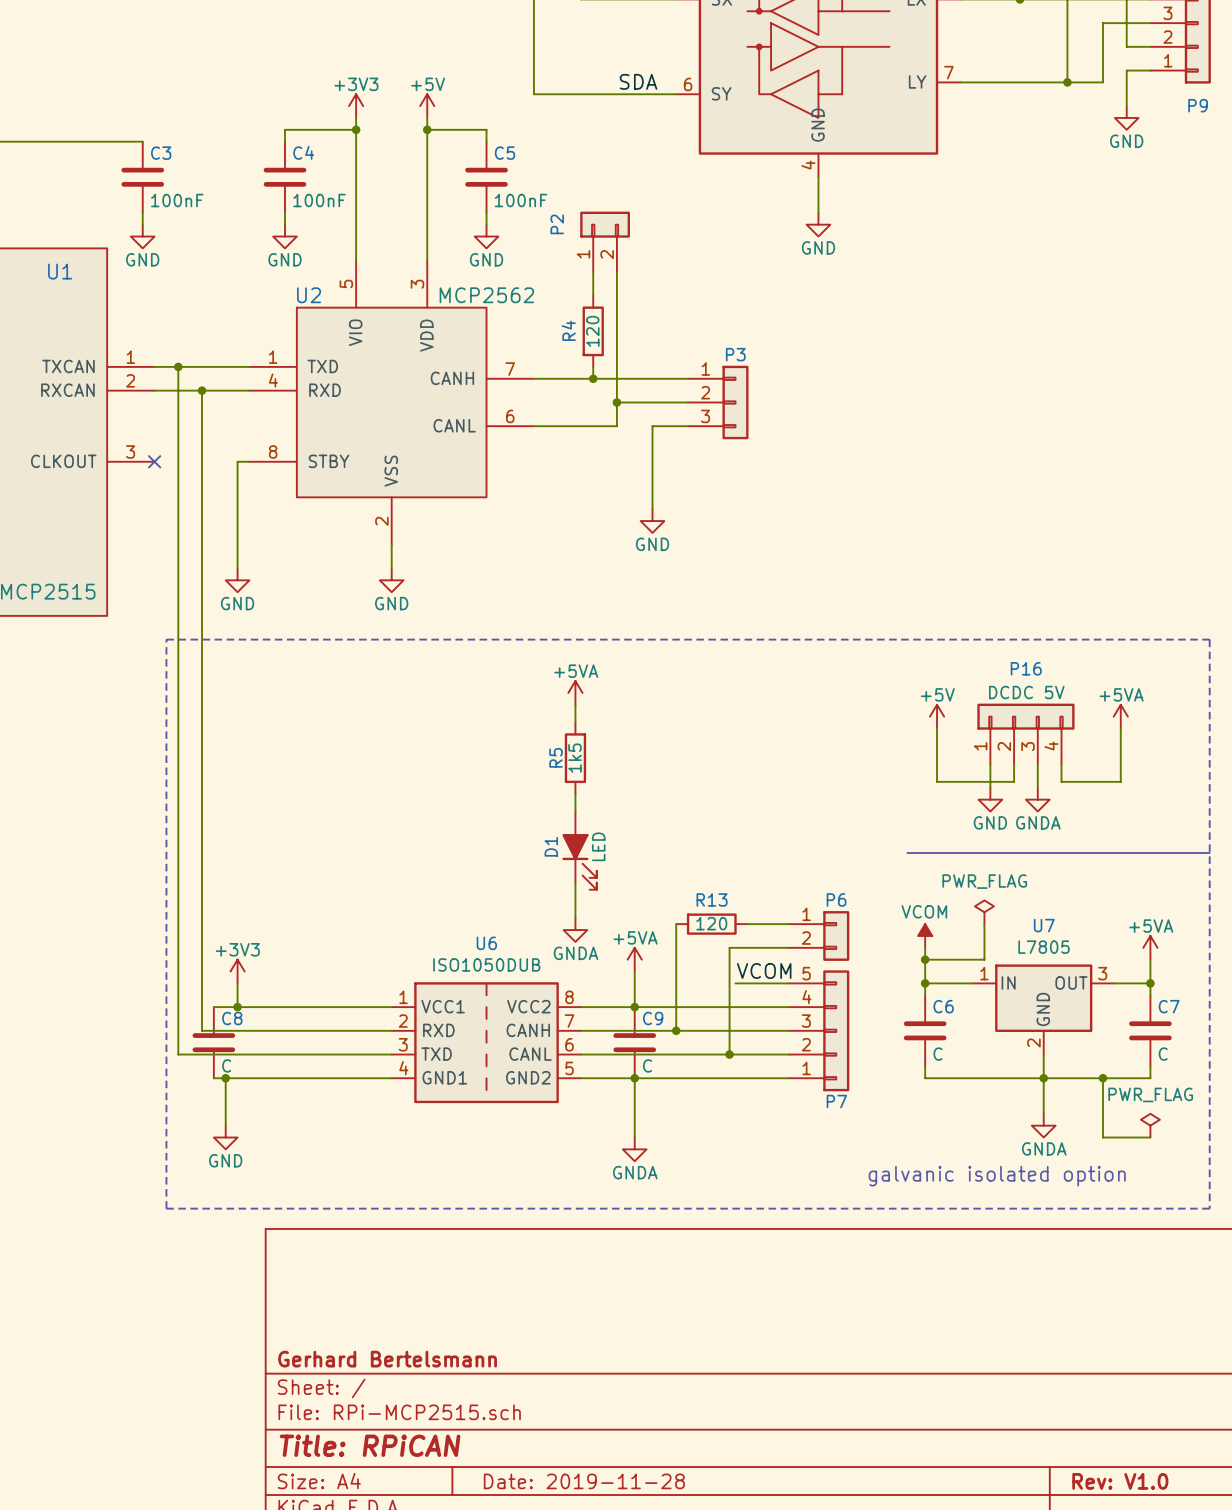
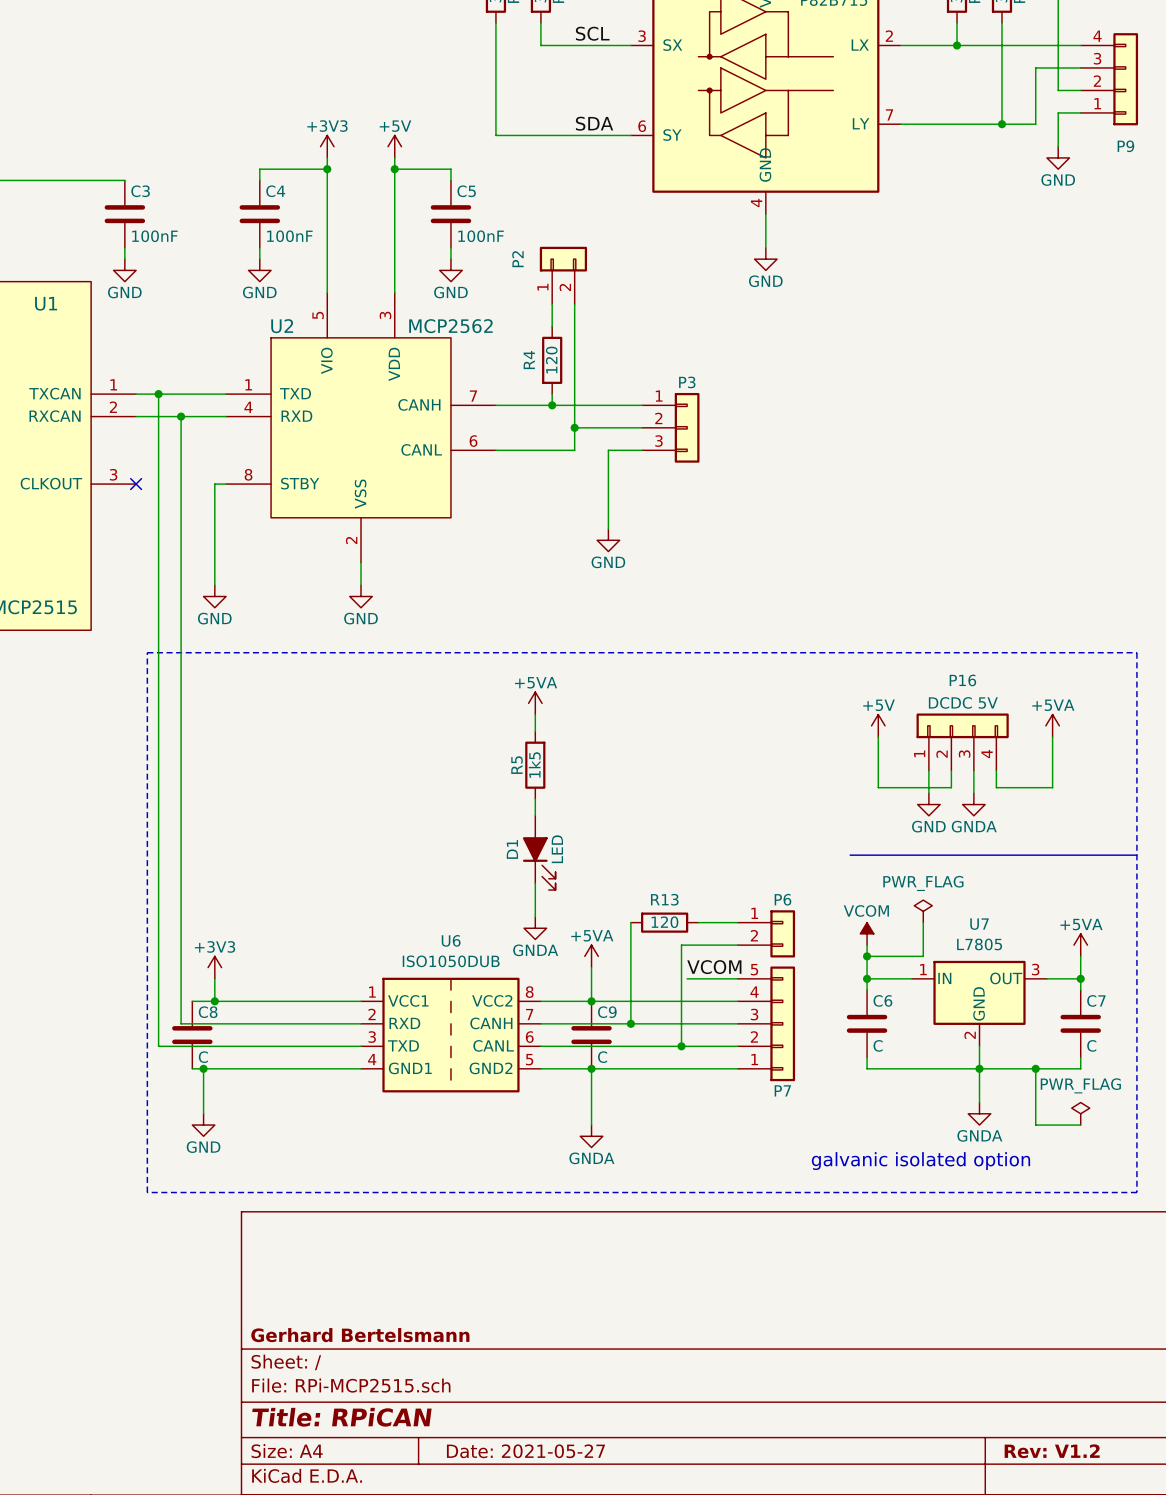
title block: Date: 2019-11-28 (584, 1481) -> Date: 2021-05-27 (525, 1451)
title block: Rev: V1.0 (1120, 1481) -> Rev: V1.2 (1052, 1451)

